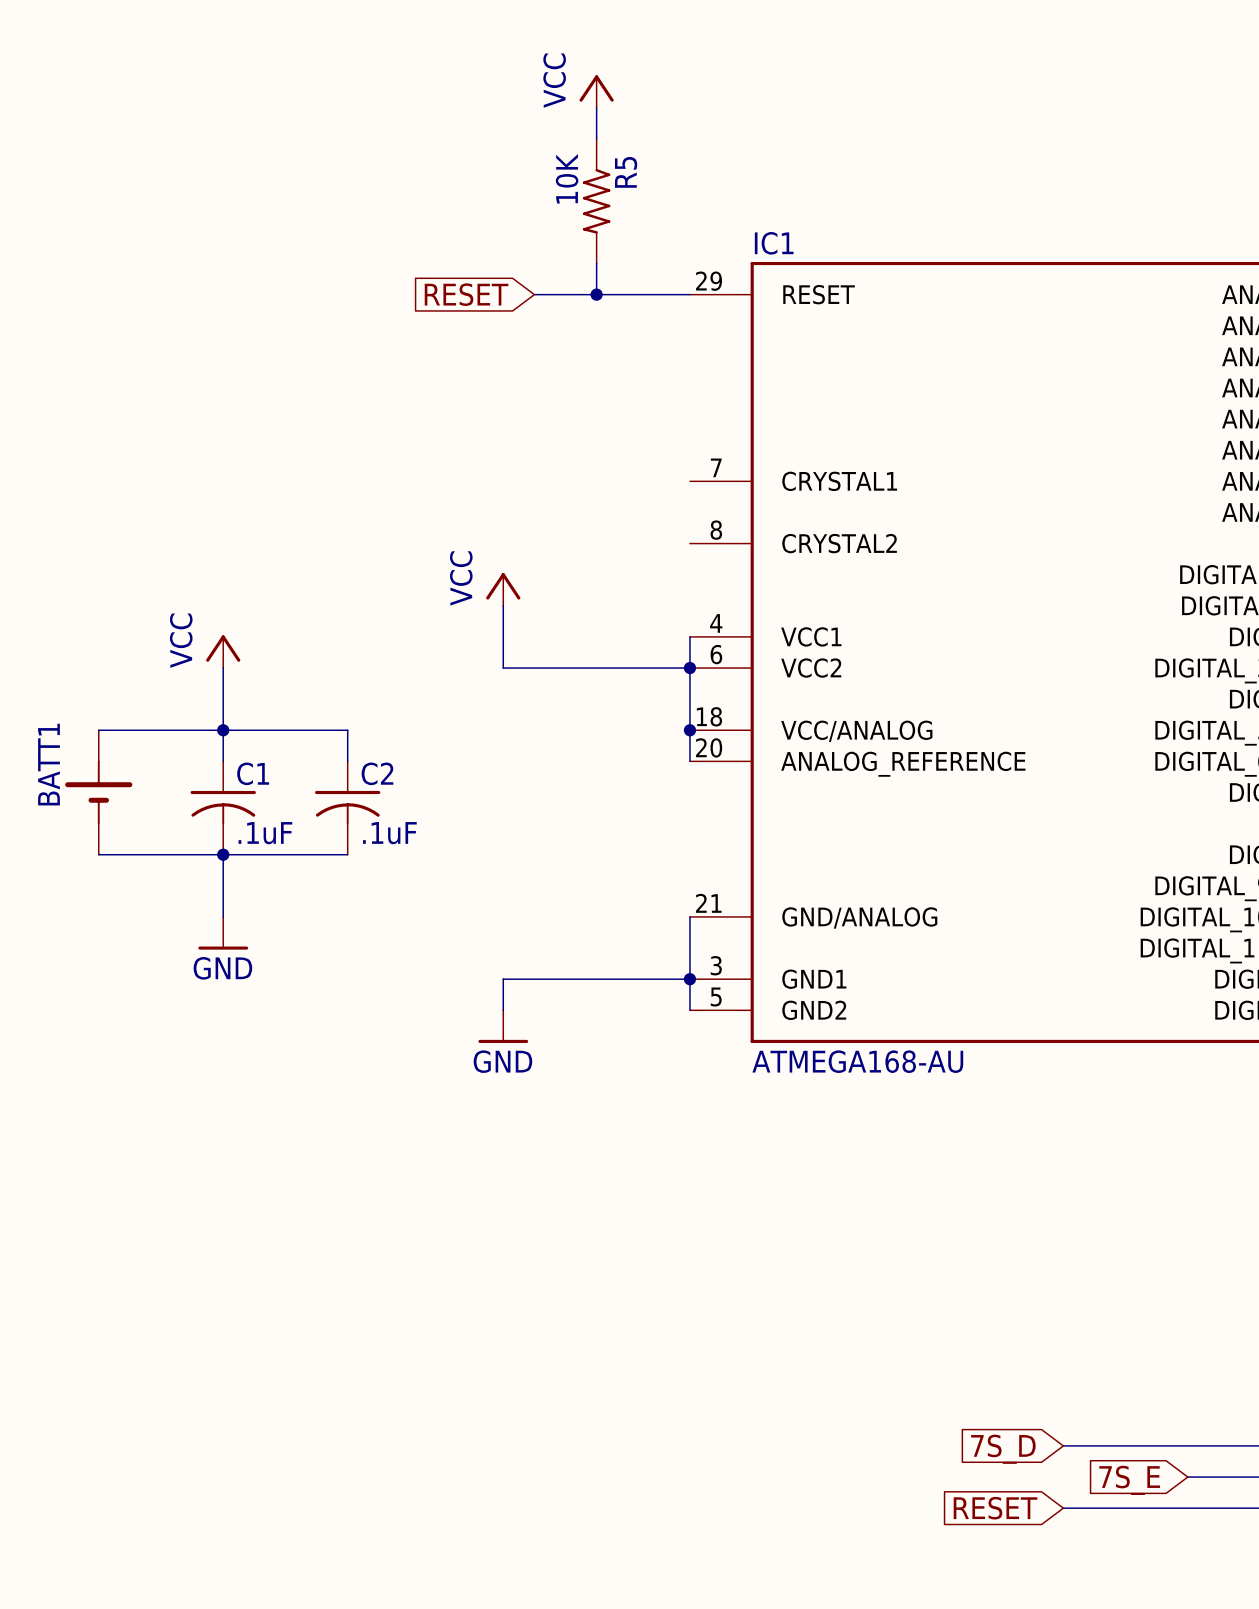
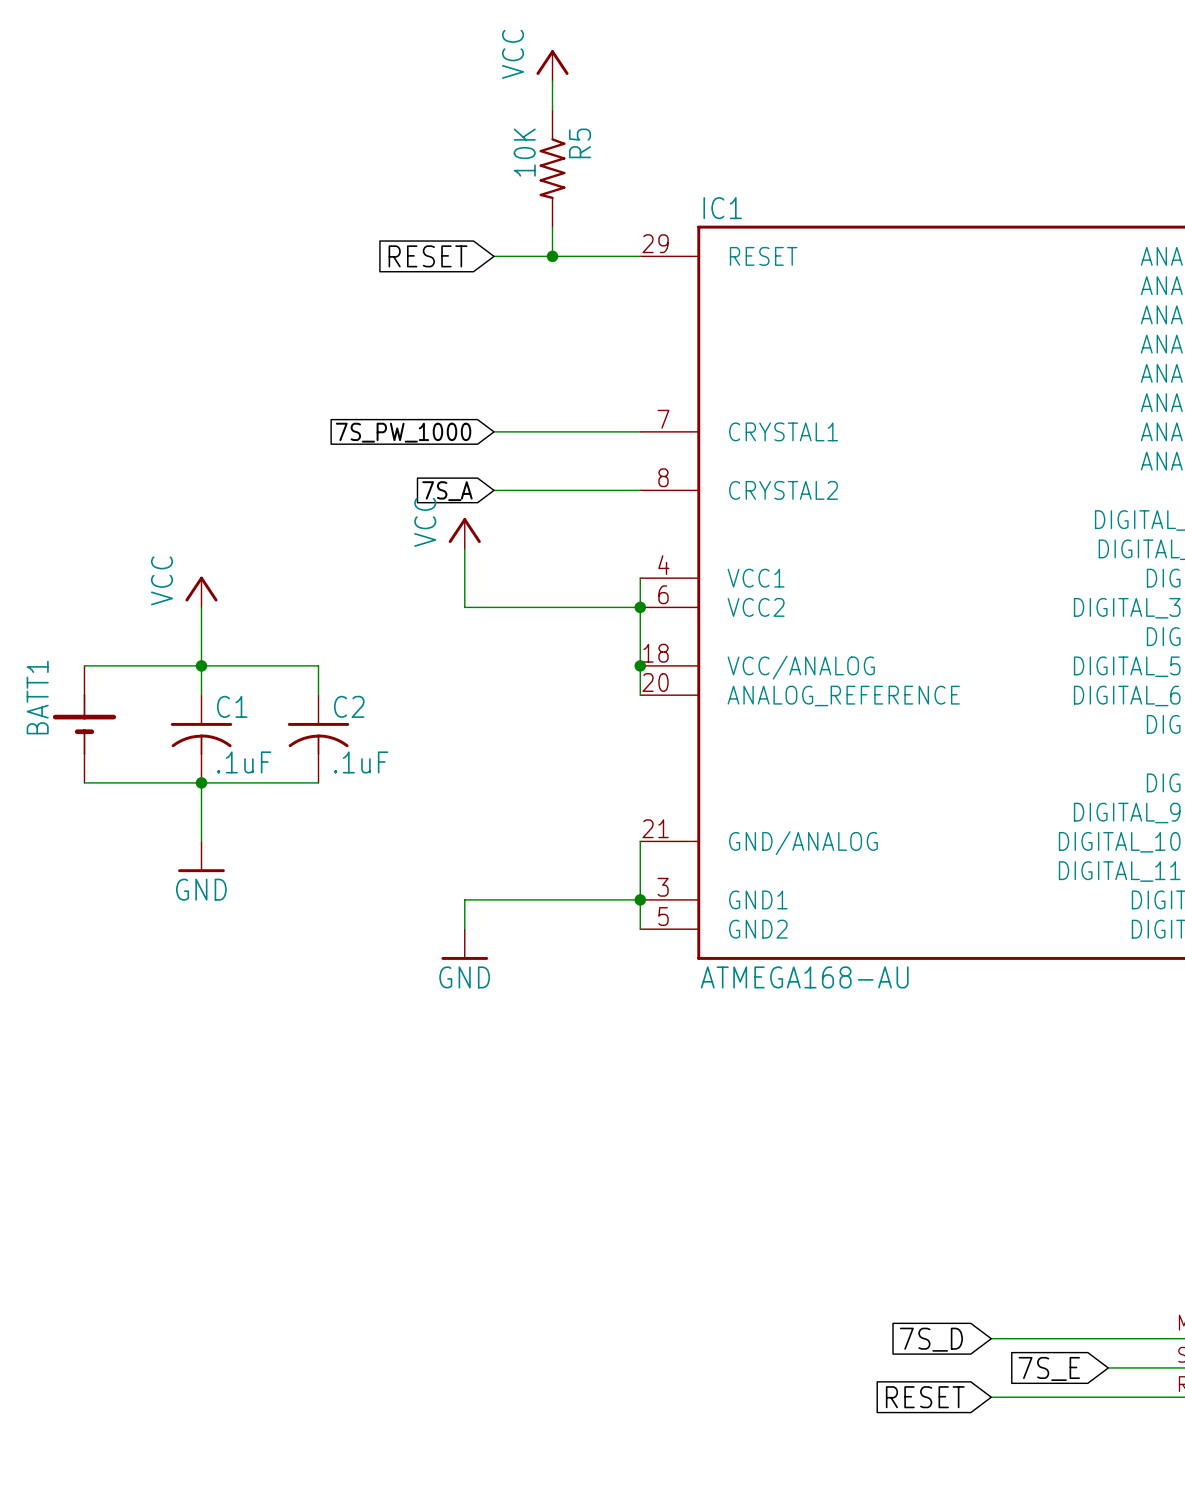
wire: none -> (494, 431) (640, 431)
global label: none -> 7S_PW_1000 (403, 432)
wire: none -> (494, 490) (640, 490)
global label: none -> 7S_A (447, 491)

